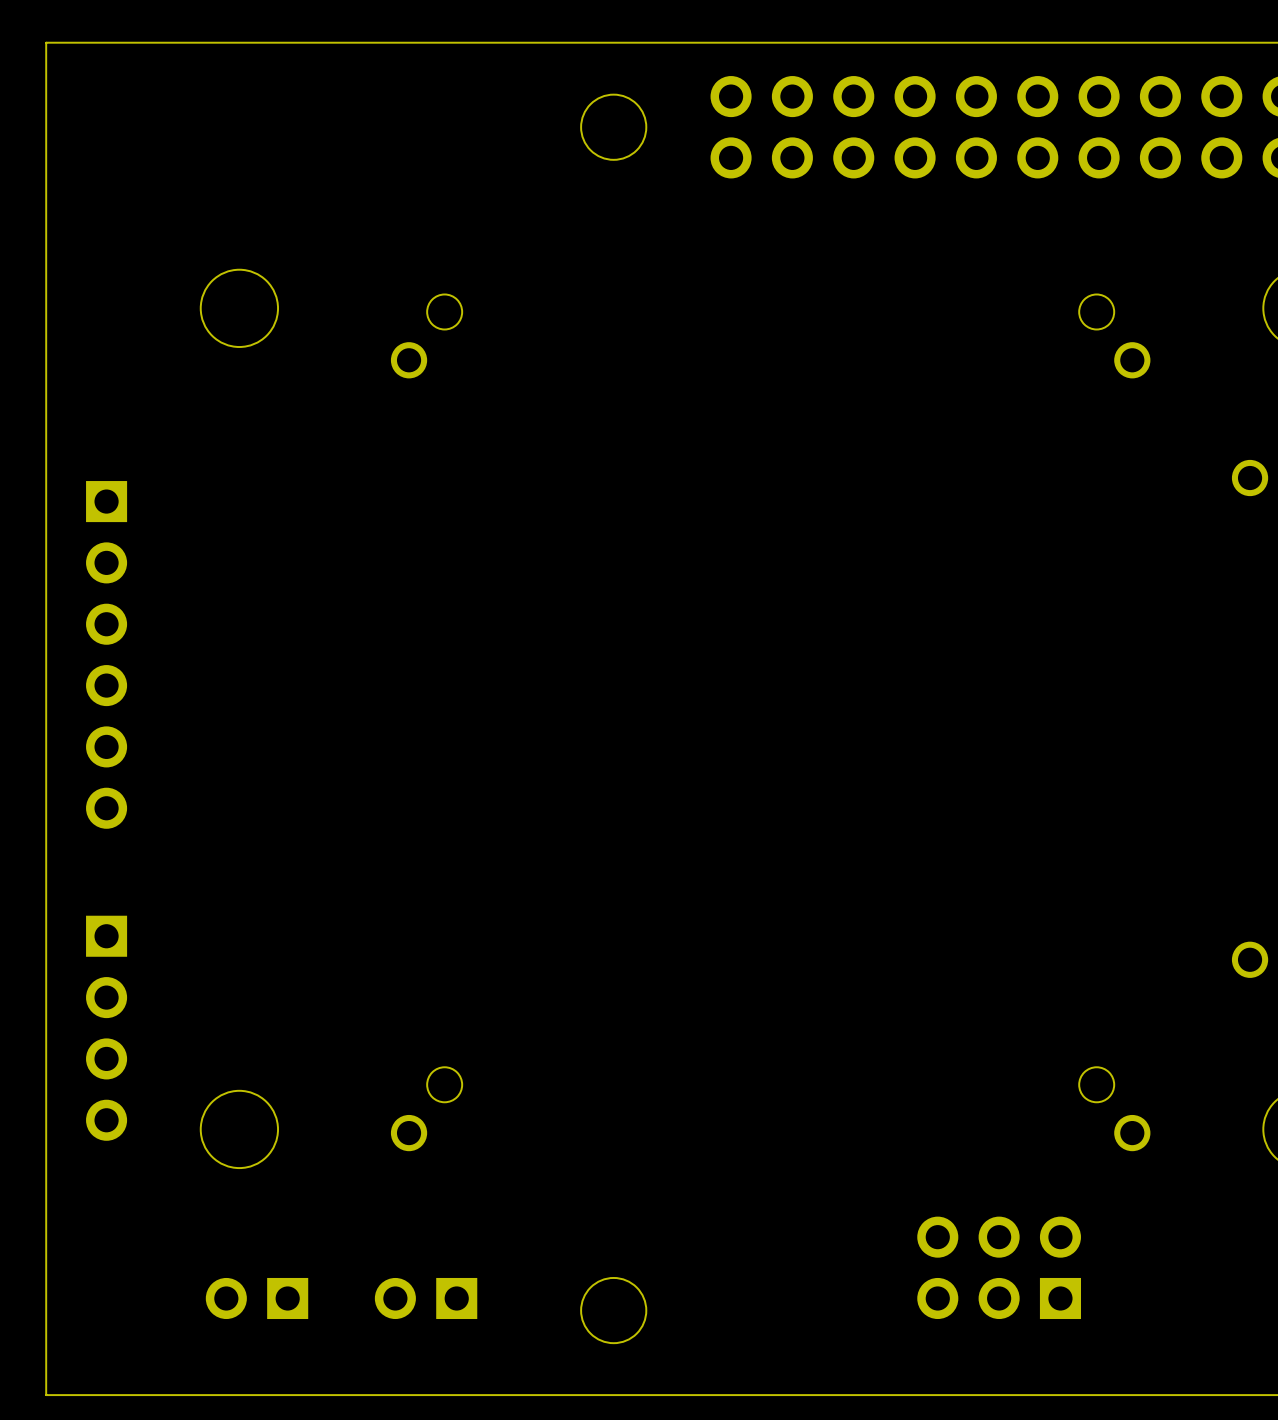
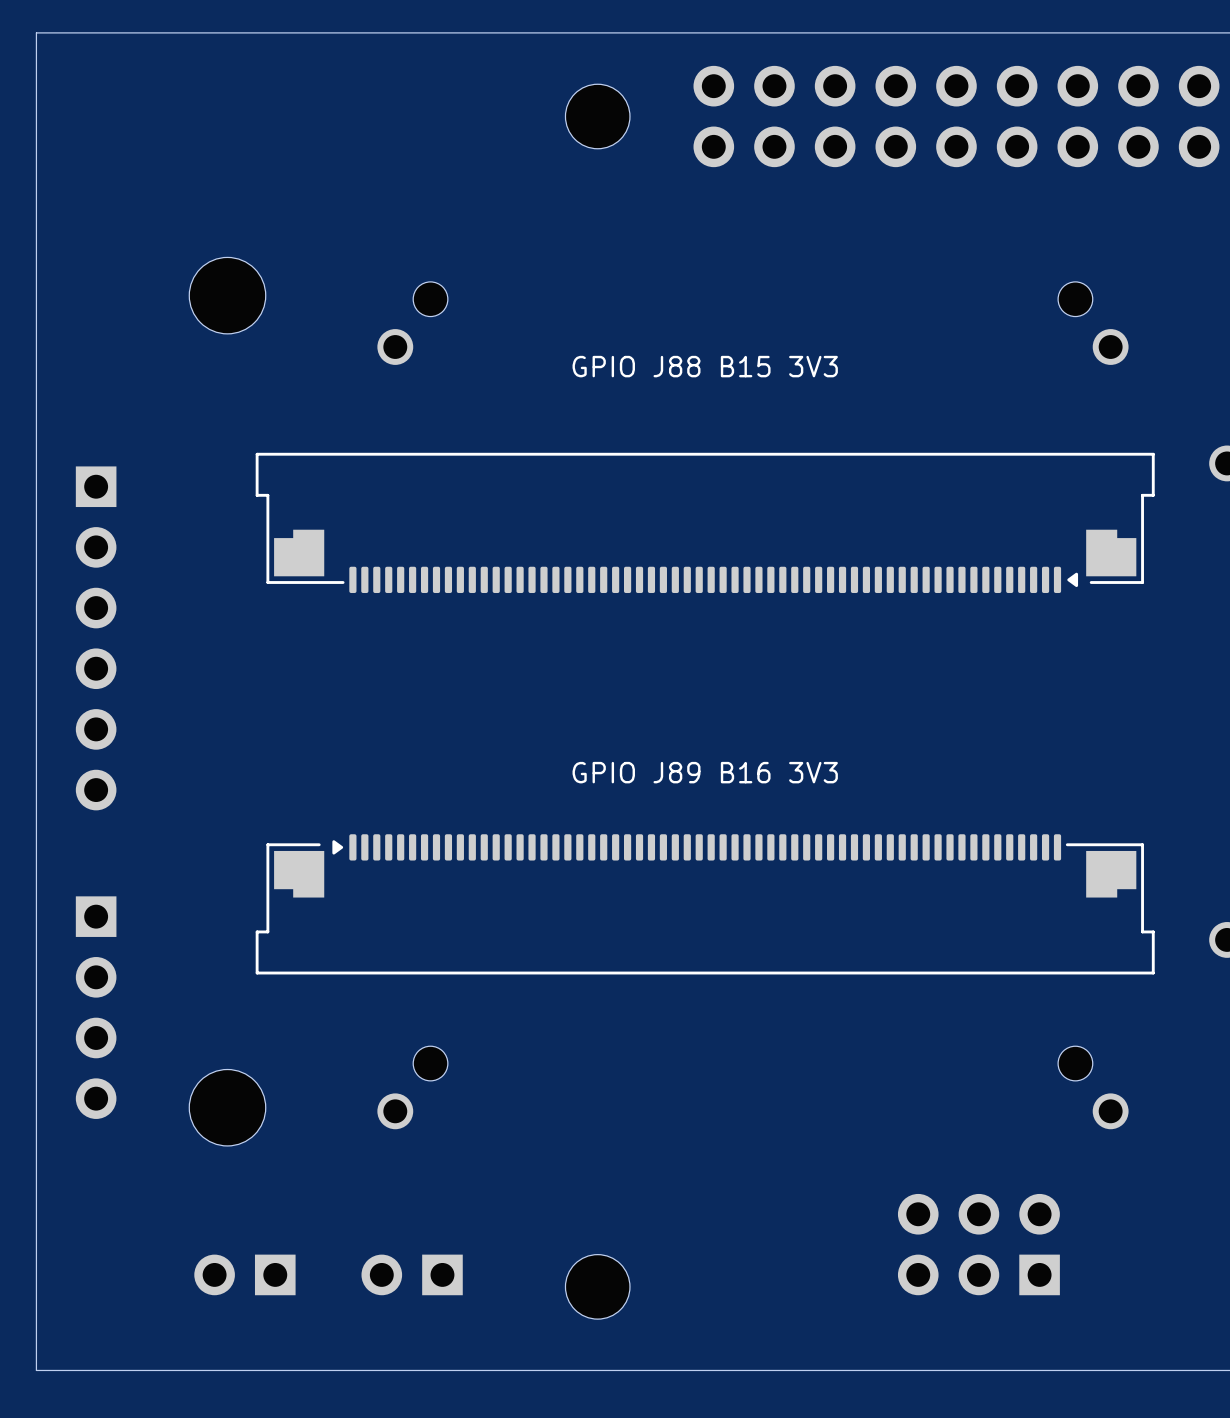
text: none -> GPIO J88 B15 3V3 (705, 366)
part: none -> (705, 522)
text: none -> GPIO J89 B16 3V3 (705, 772)
part: none -> (705, 904)

